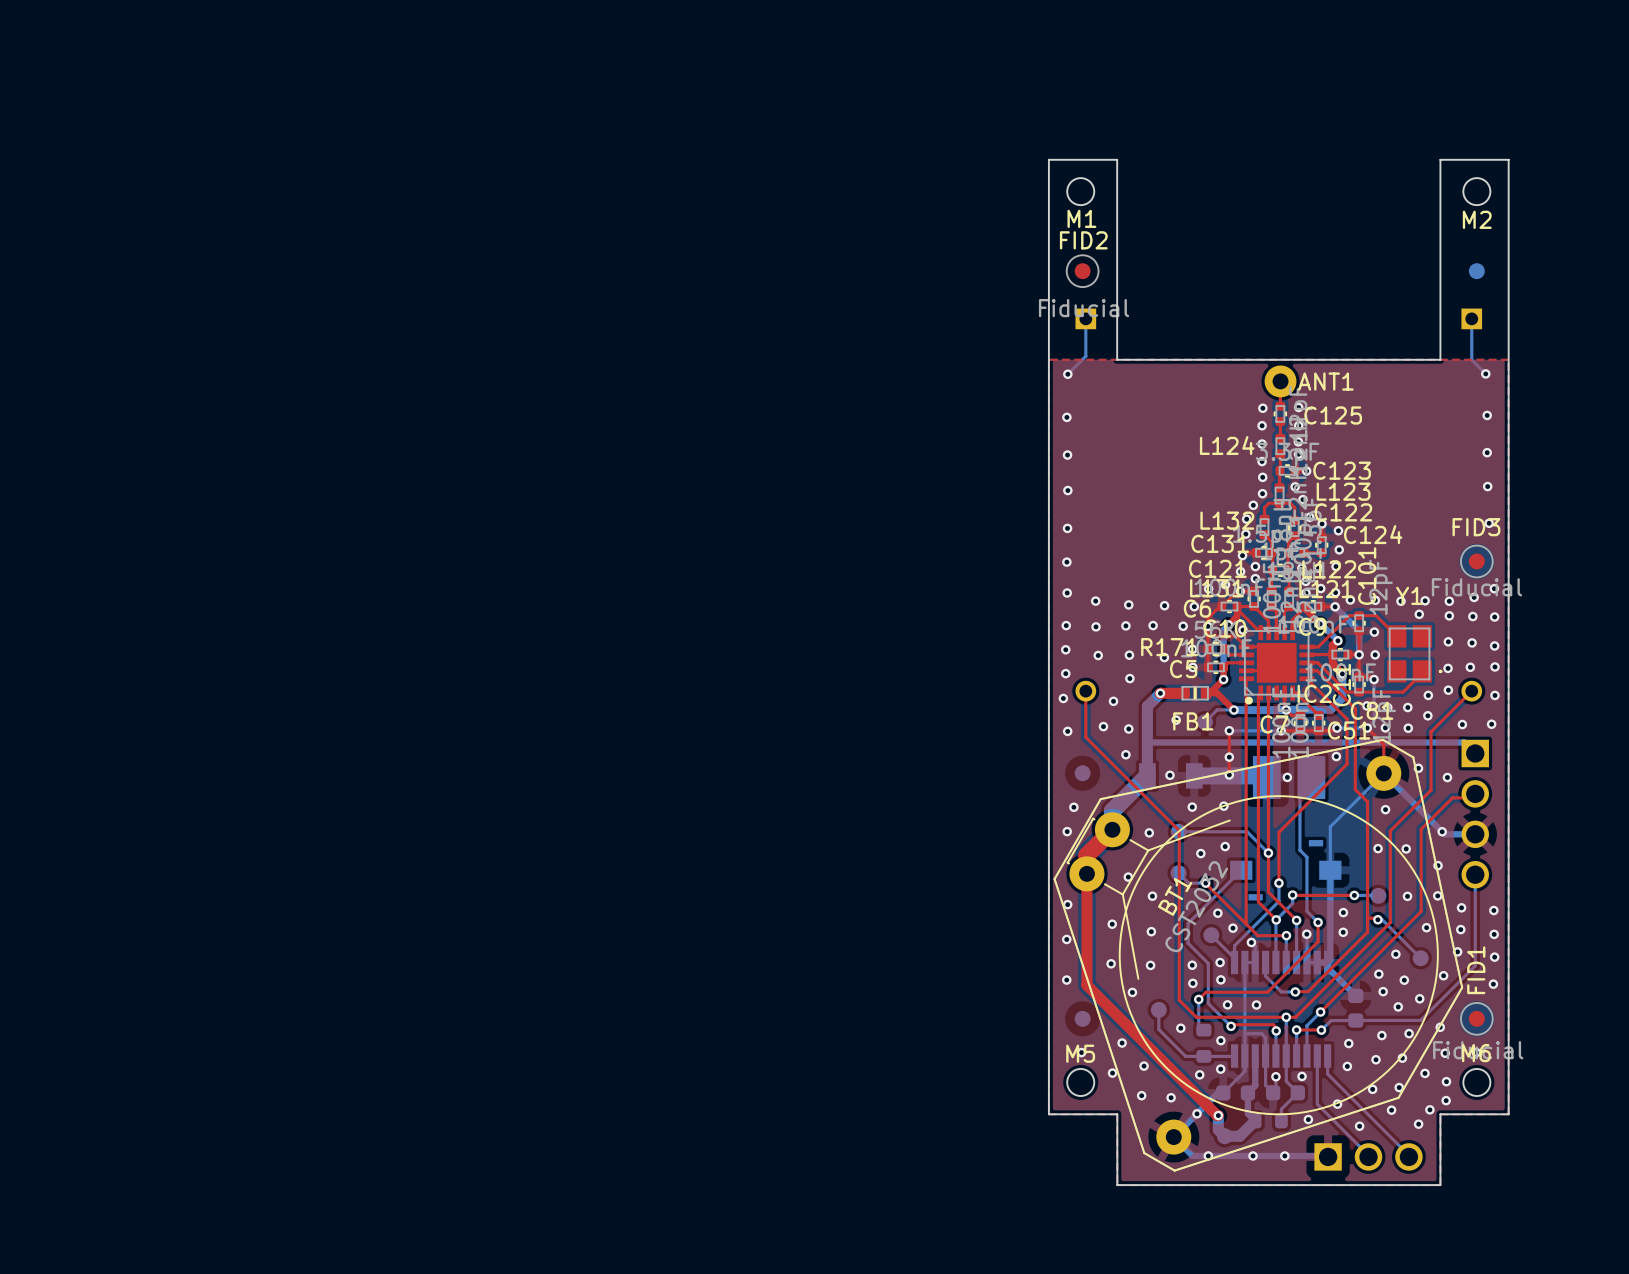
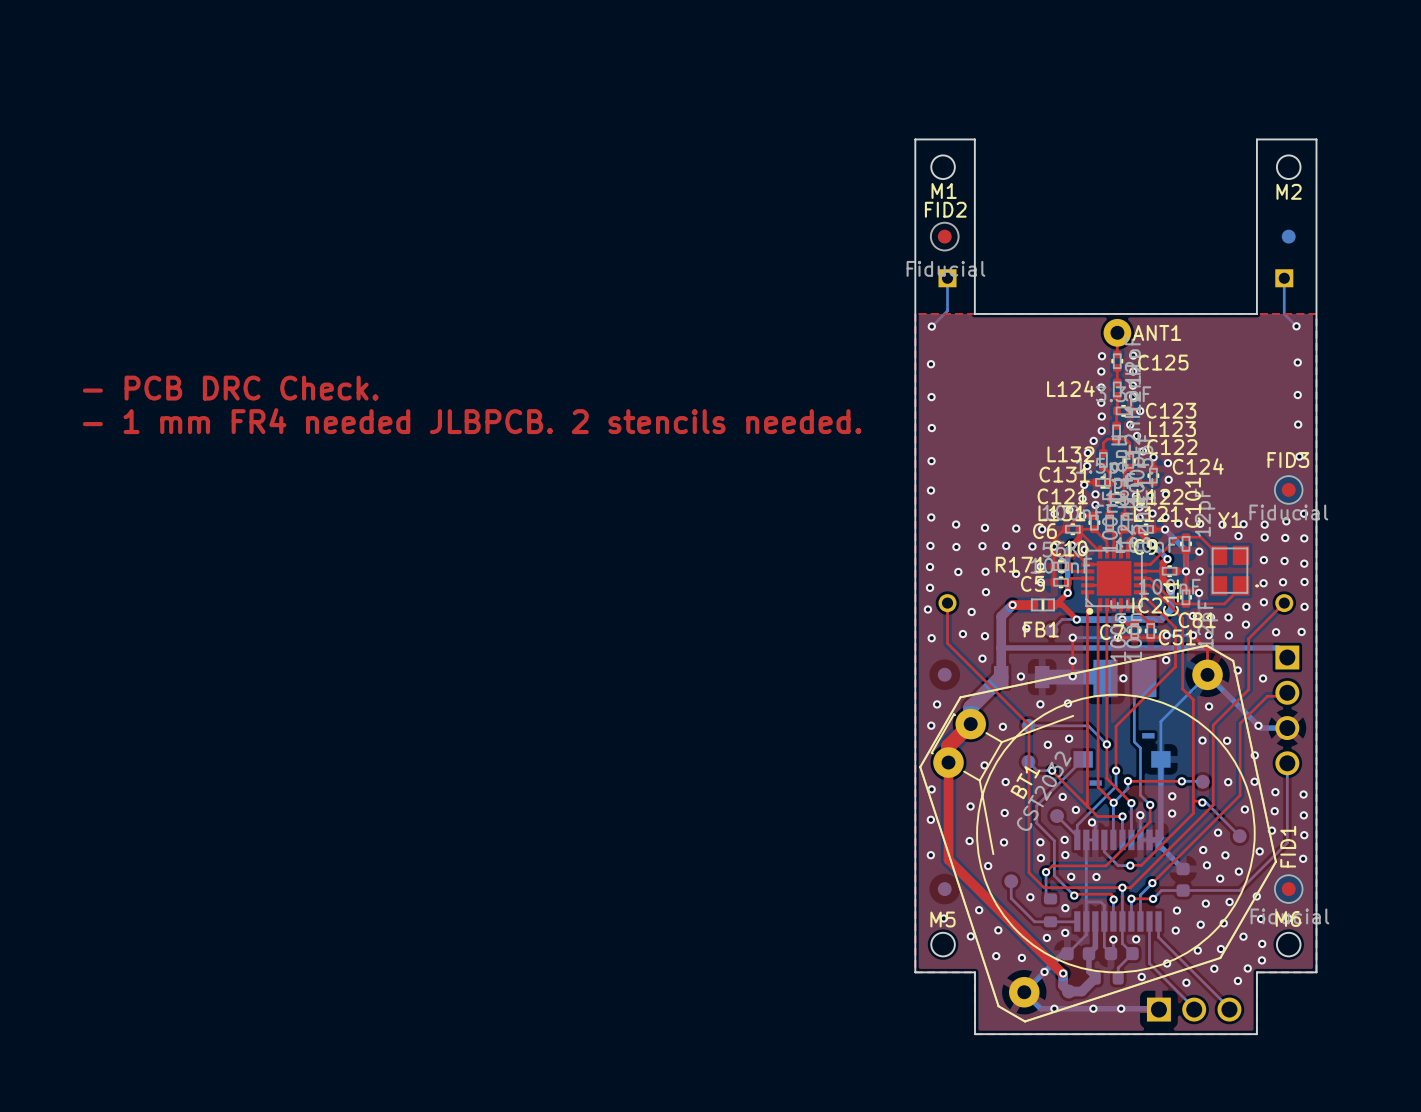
text: none -> - PCB DRC Check. (230, 388)
text: none -> - 1 mm FR4 needed JLBPCB. 2 stencils needed. (472, 421)

